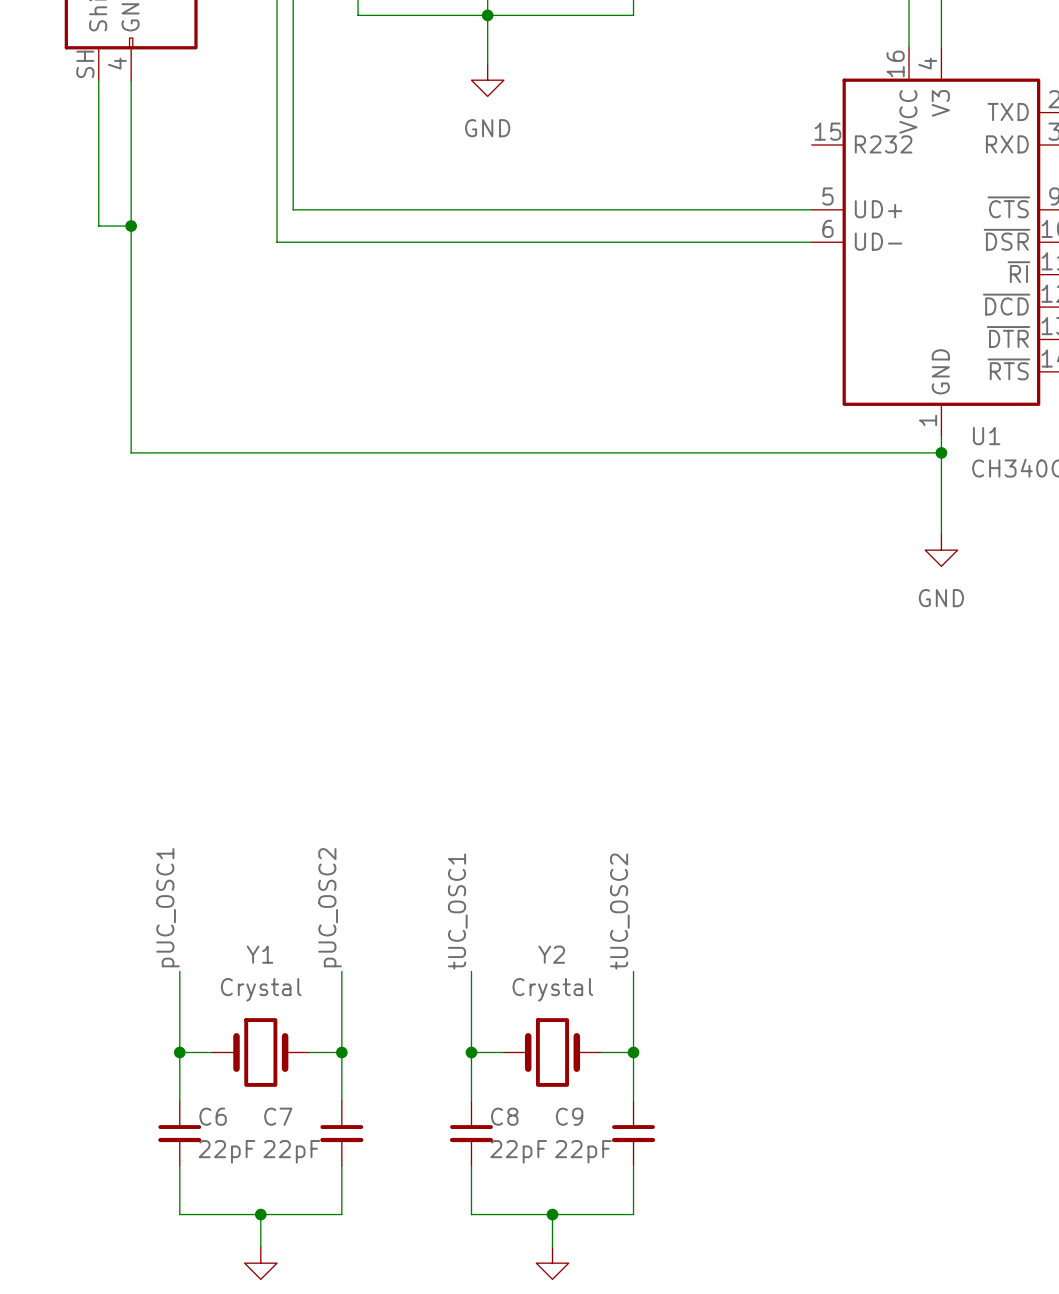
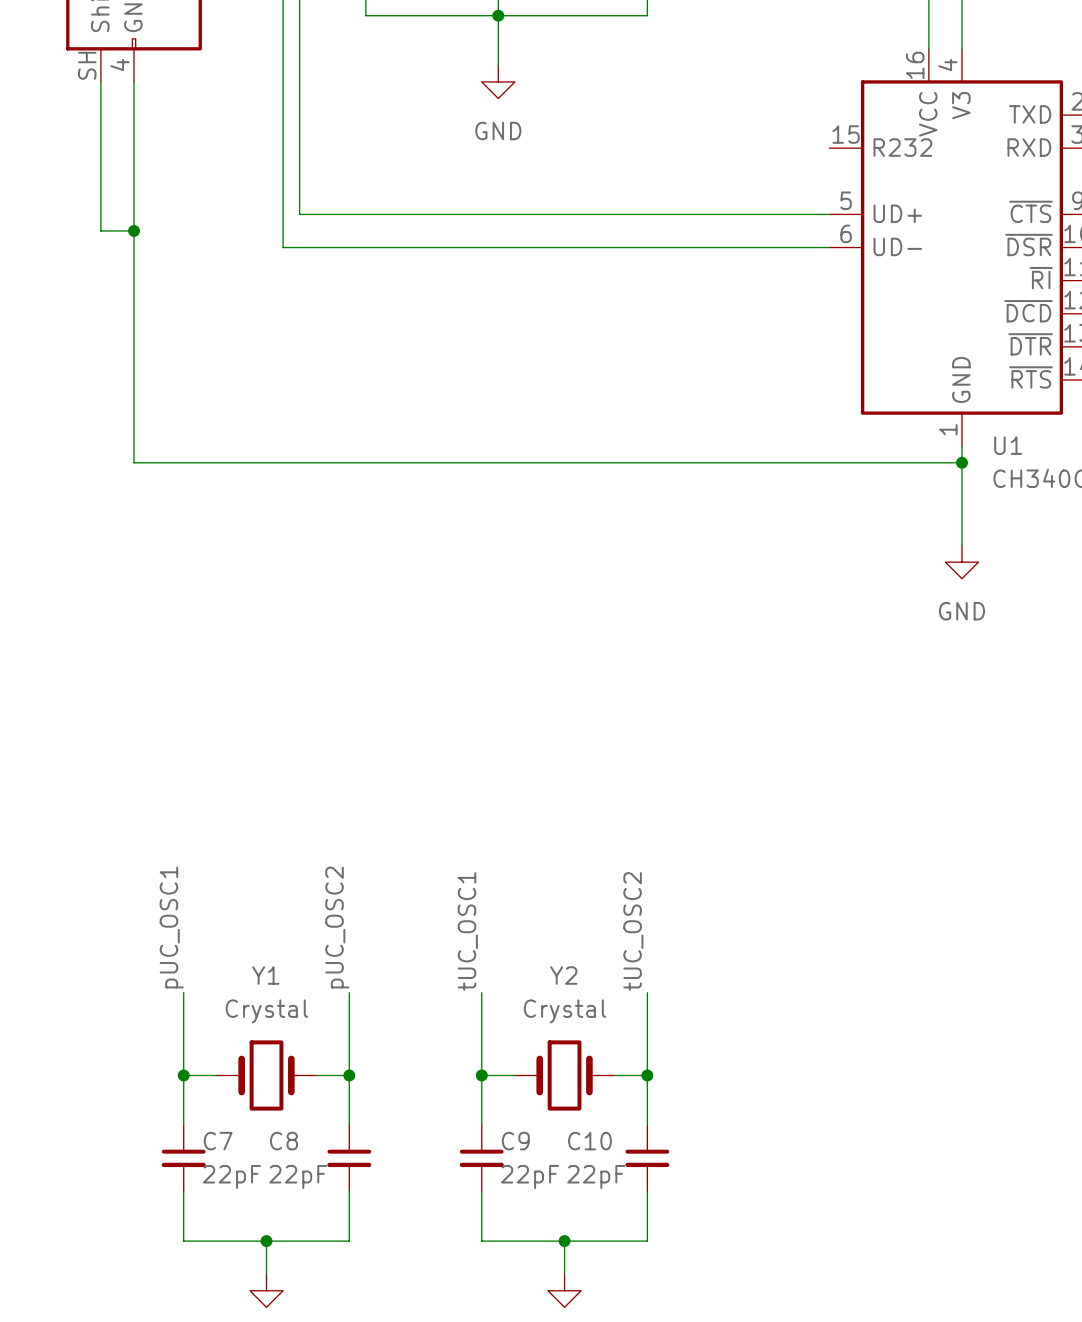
C6 name: C6 (213, 1116) -> C7 (218, 1141)
C7 name: C7 (278, 1116) -> C8 (283, 1141)
C8 name: C8 (504, 1116) -> C9 (515, 1141)
C9 name: C9 (569, 1116) -> C10 (589, 1141)

